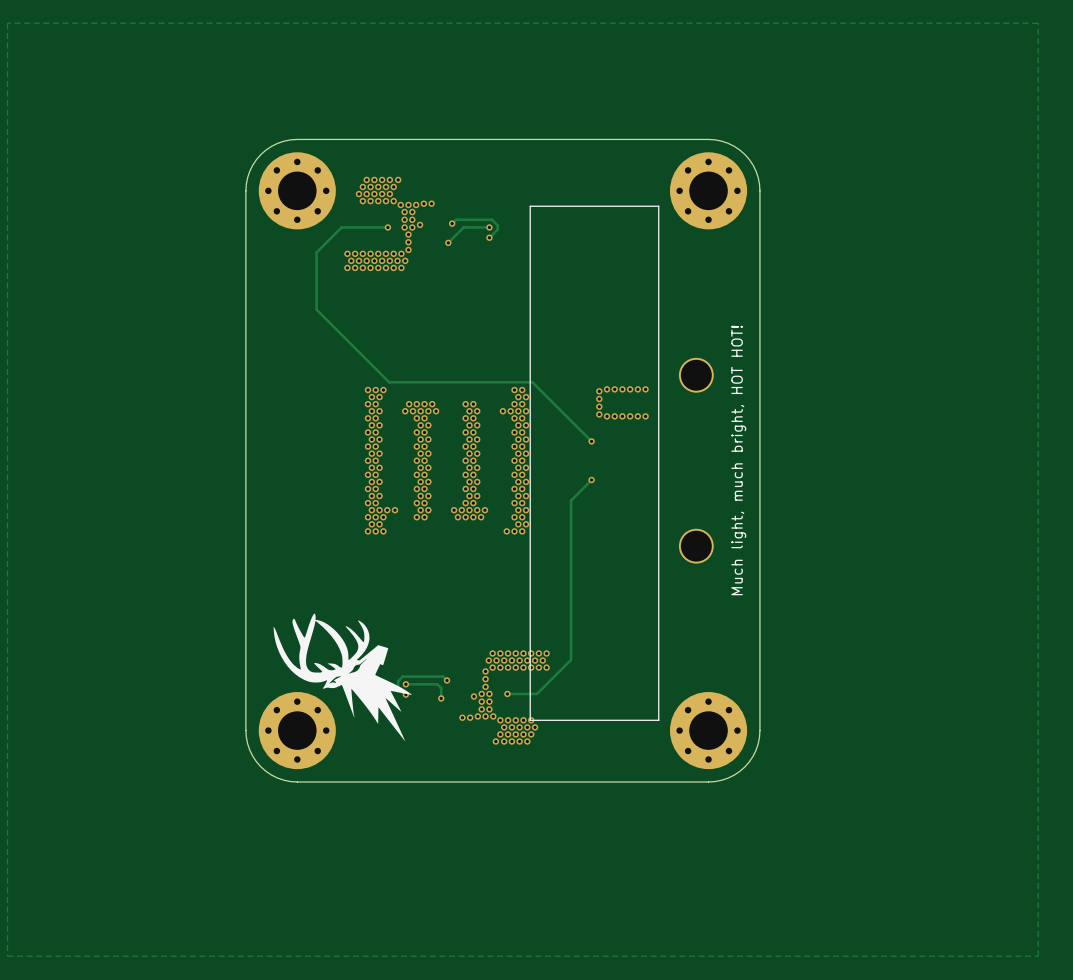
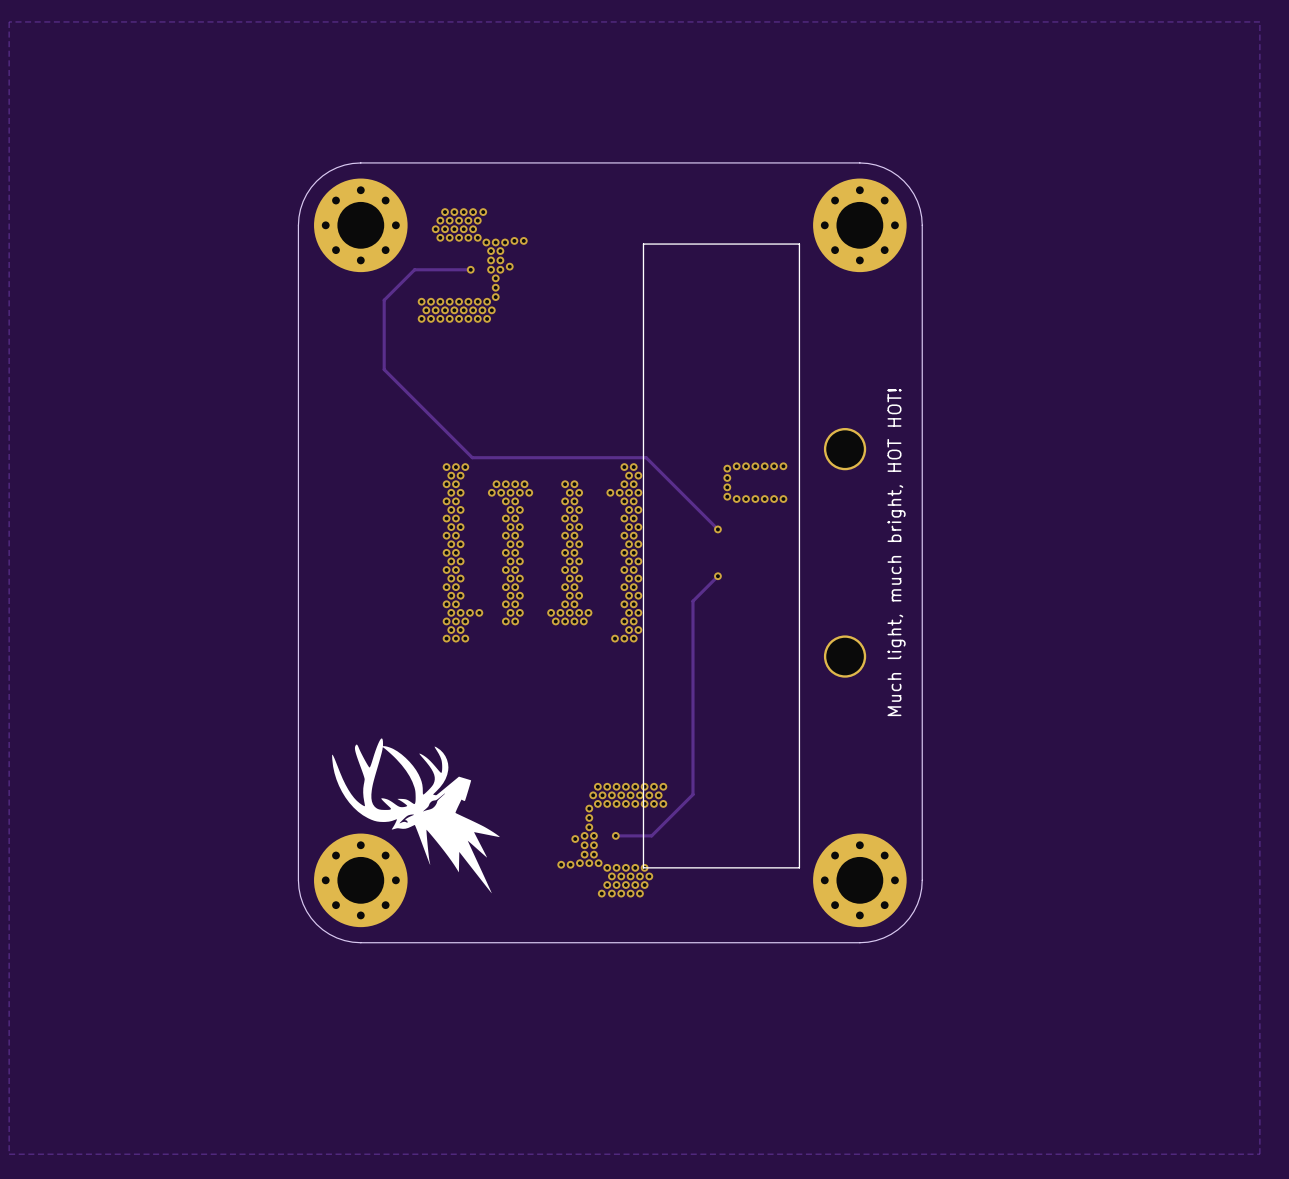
track: (452, 223) (456, 219) (492, 219) (497, 225) (497, 229) (489, 237) -> none
via: (452, 223) -> none
track: (489, 227) (463, 227) (448, 242) -> none
via: (489, 227) -> none
via: (489, 237) -> none
via: (448, 242) -> none
track: (447, 680) (443, 676) (402, 676) (398, 681) (398, 687) (405, 694) -> none
via: (447, 680) -> none
track: (405, 684) (437, 684) (441, 688) (441, 698) -> none
via: (405, 684) -> none
via: (405, 694) -> none
via: (441, 698) -> none

